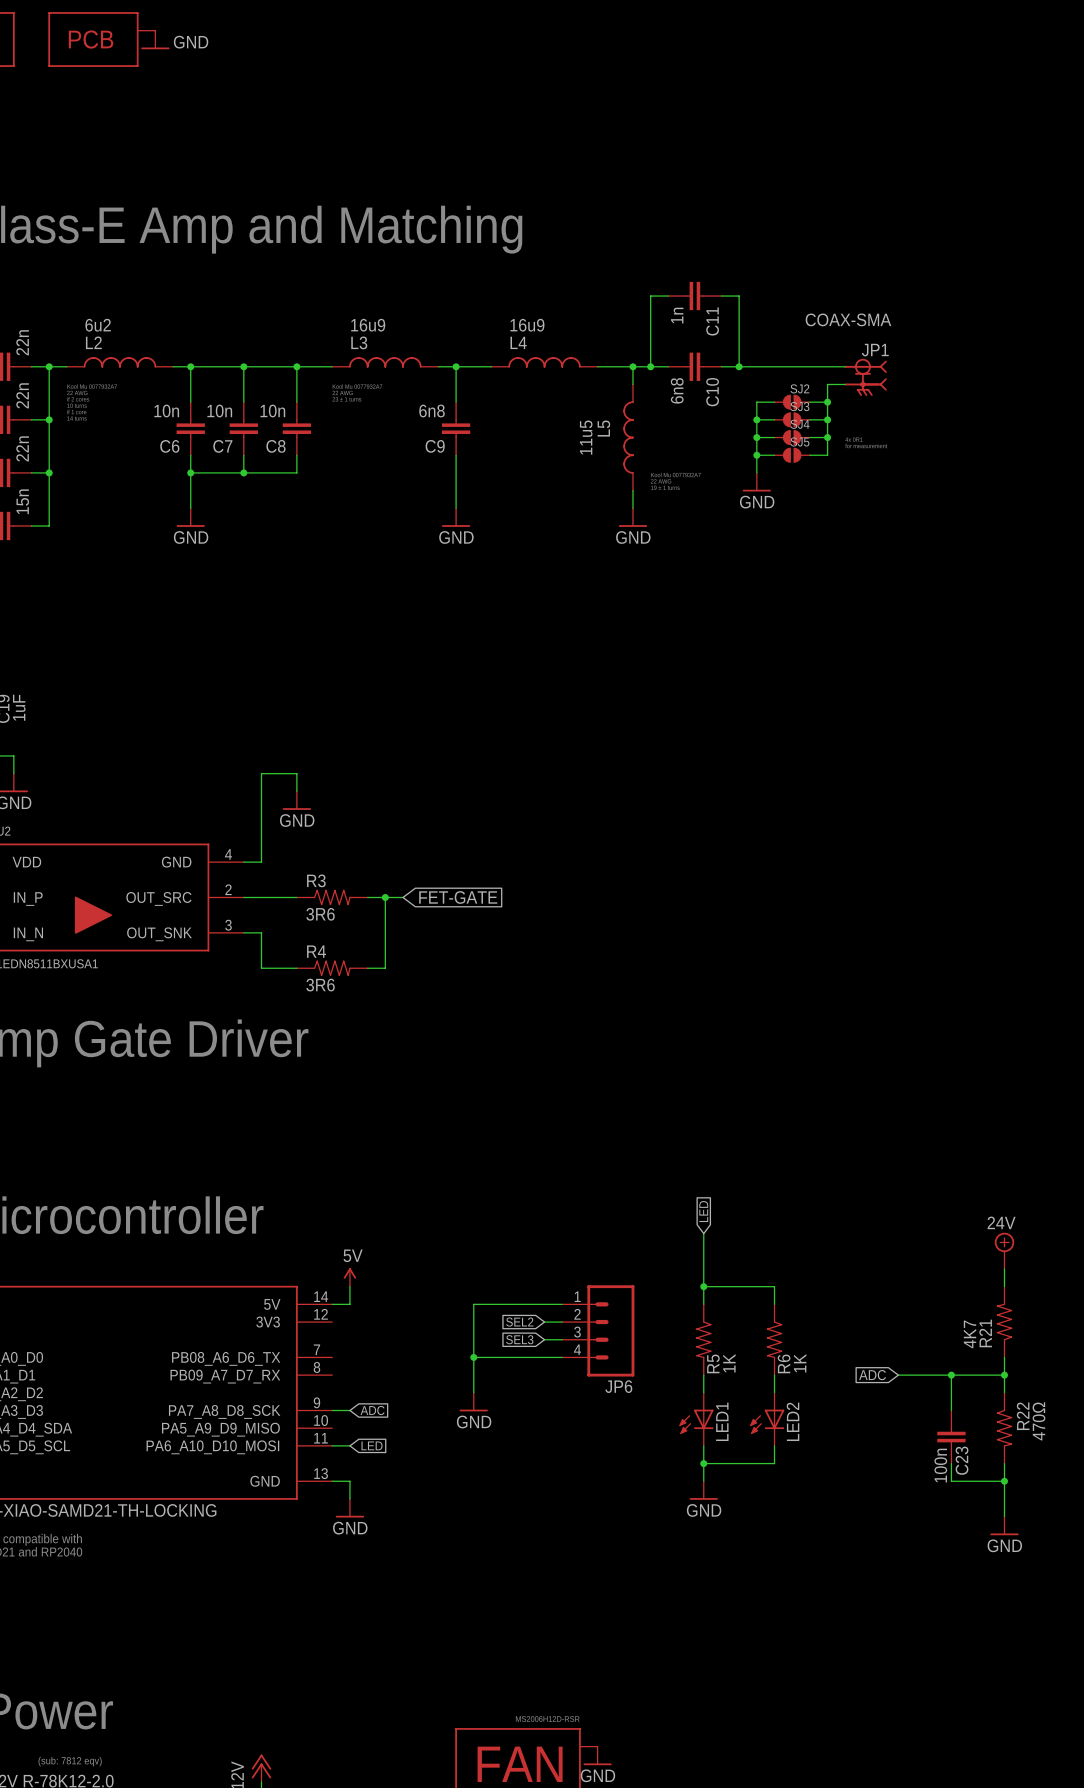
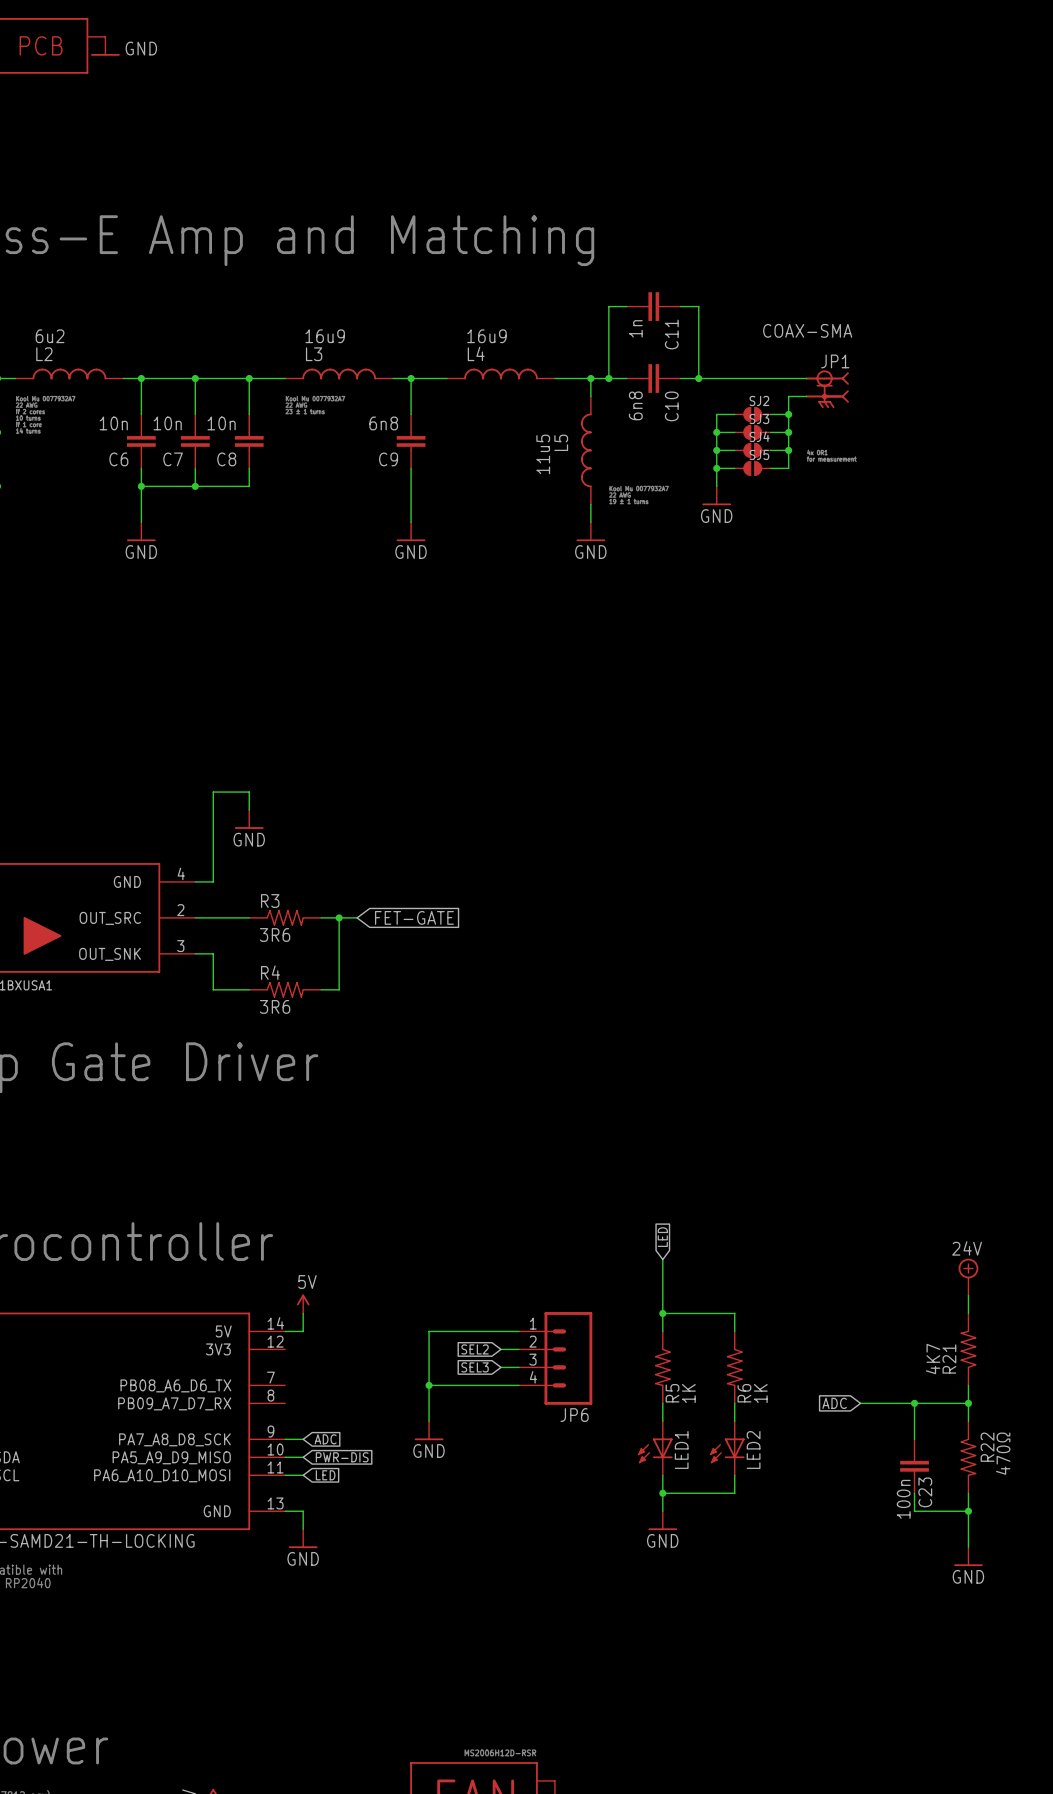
wire: none -> (285, 1457) (303, 1457)
global label: none -> PWR-DIS (342, 1457)

